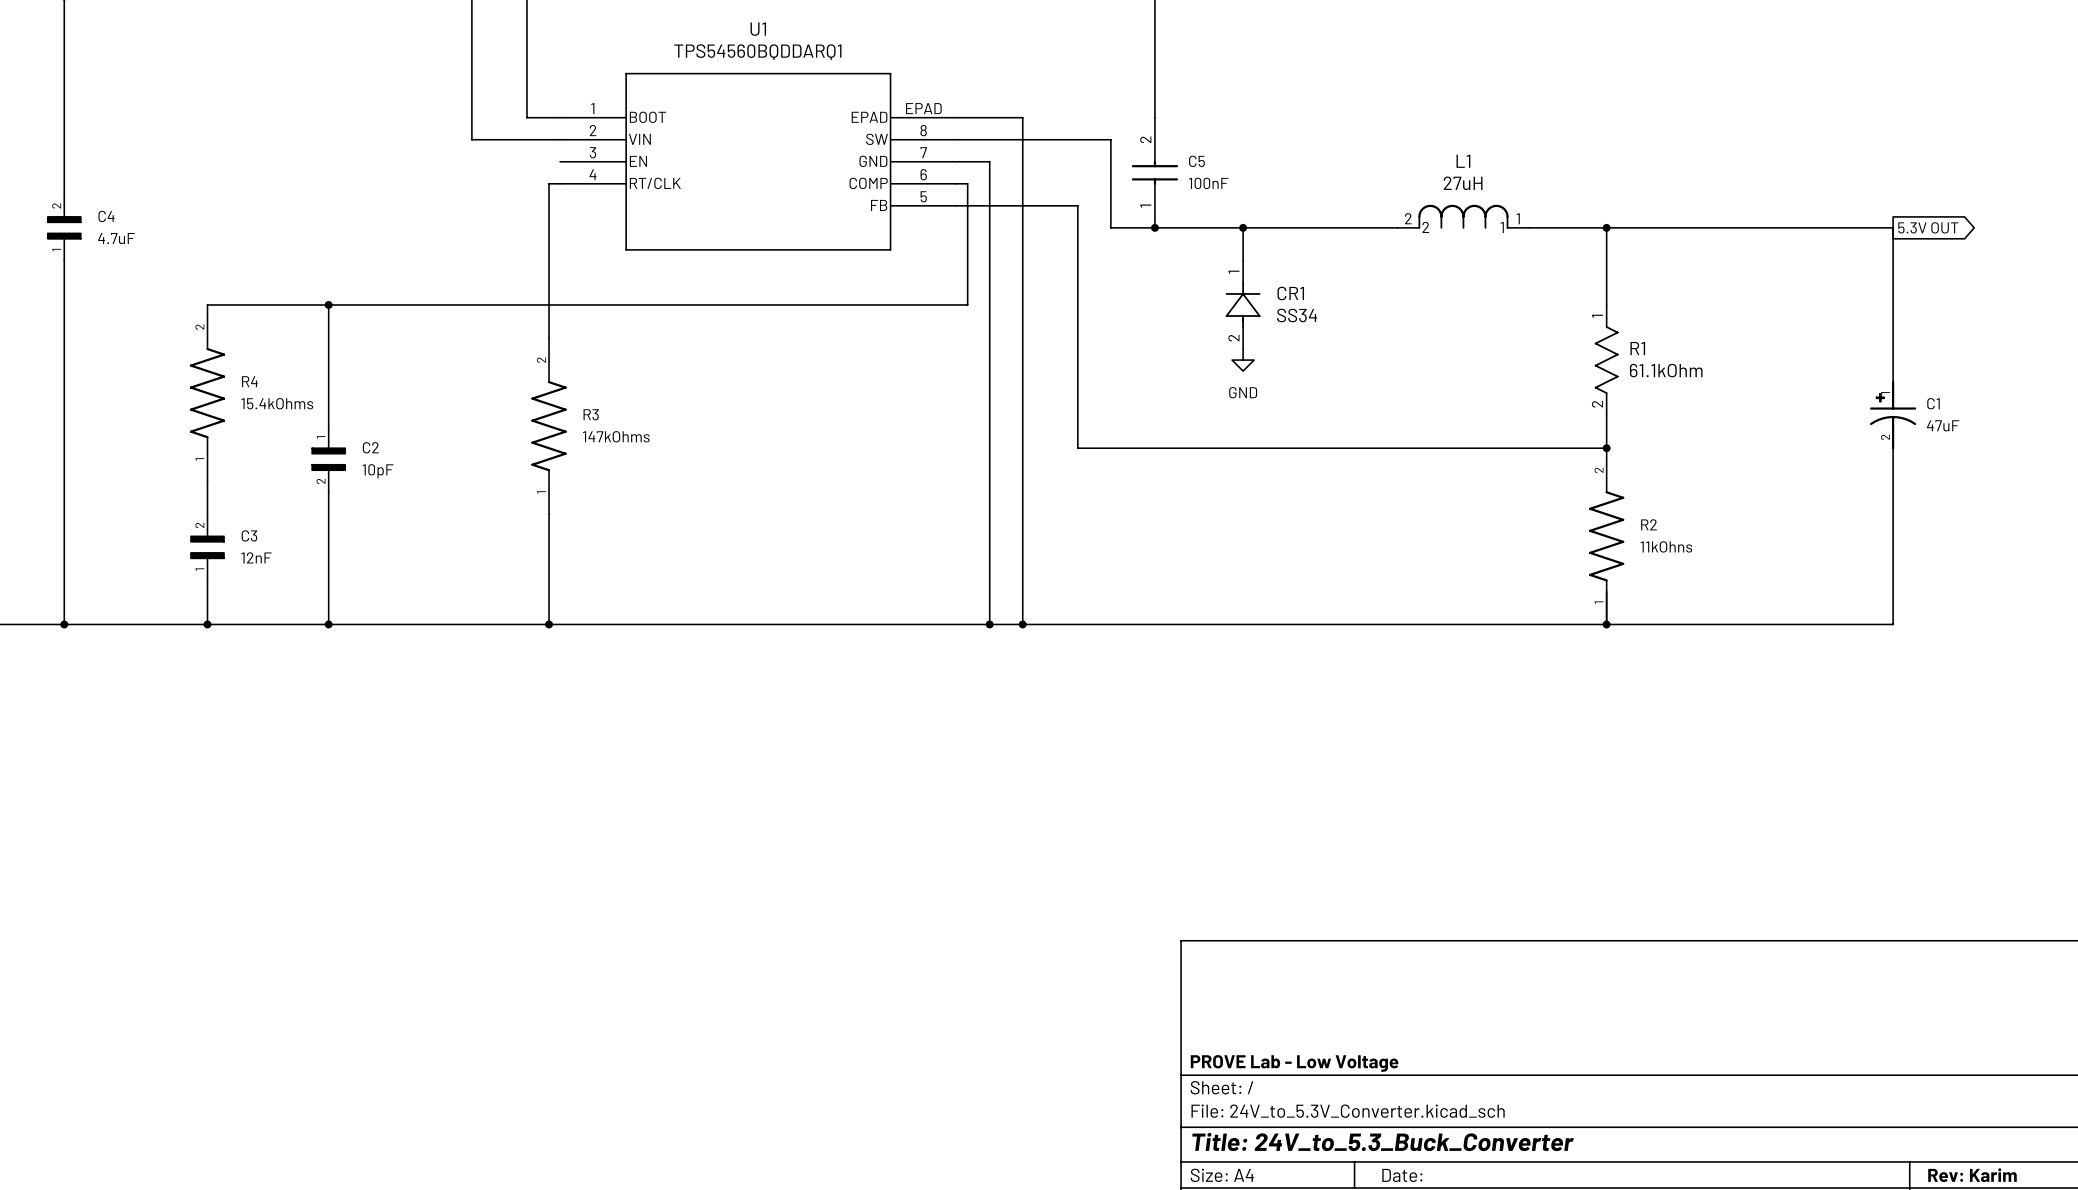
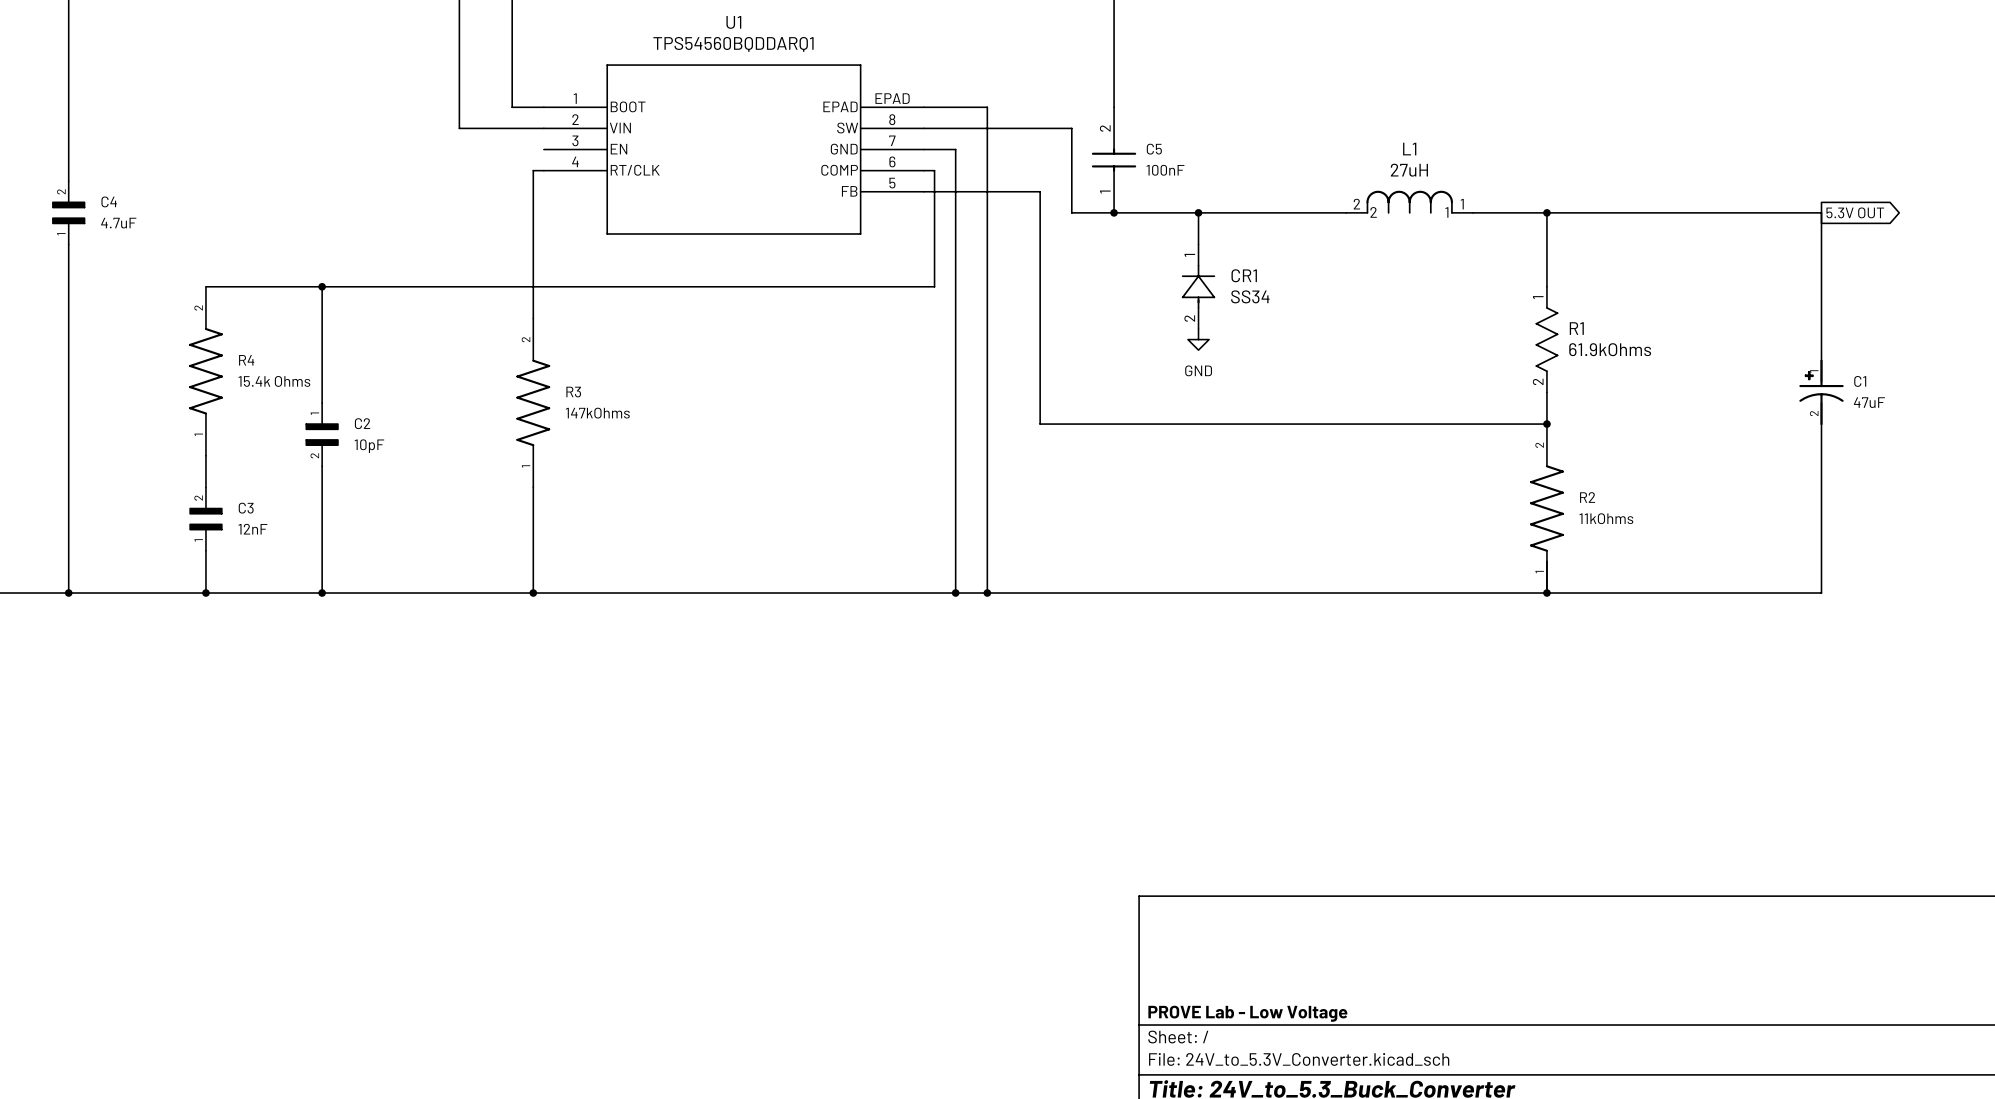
R1 value: 61.1kOhm (1666, 370) -> 61.9kOhms (1610, 349)
R4 value: 15.4kOhms (277, 403) -> 15.4k Ohms (274, 381)
R2 value: 11kOhns (1666, 546) -> 11kOhms (1606, 518)

